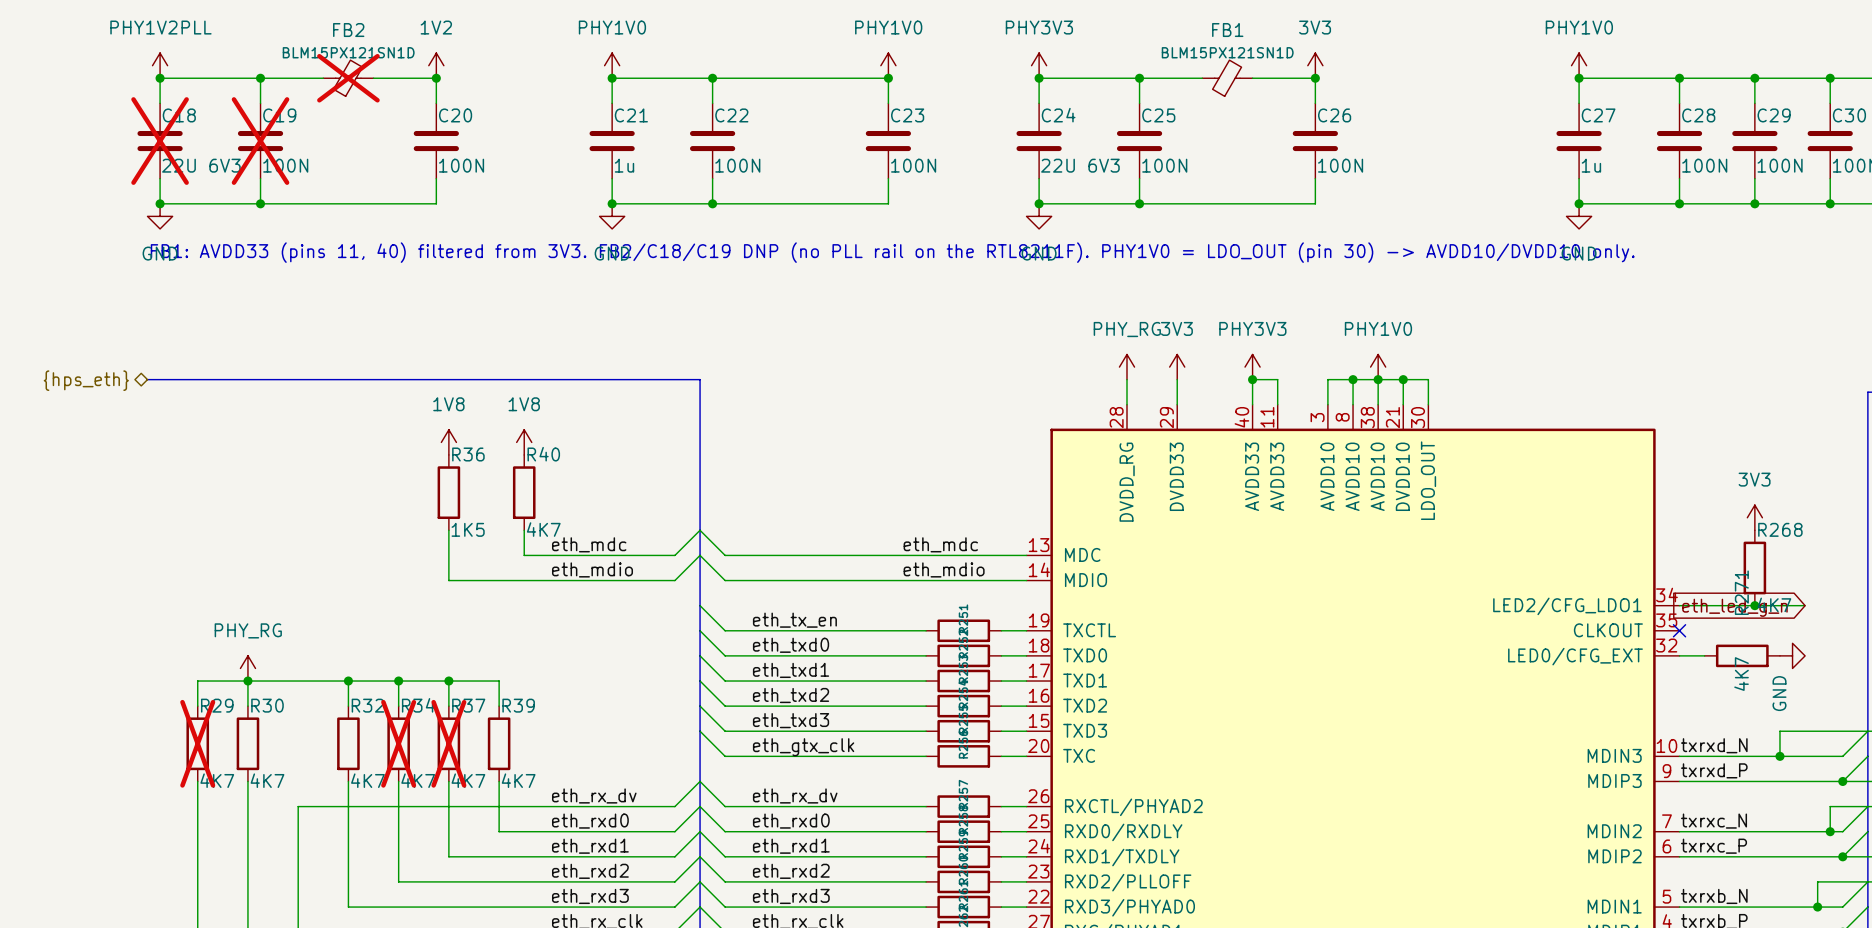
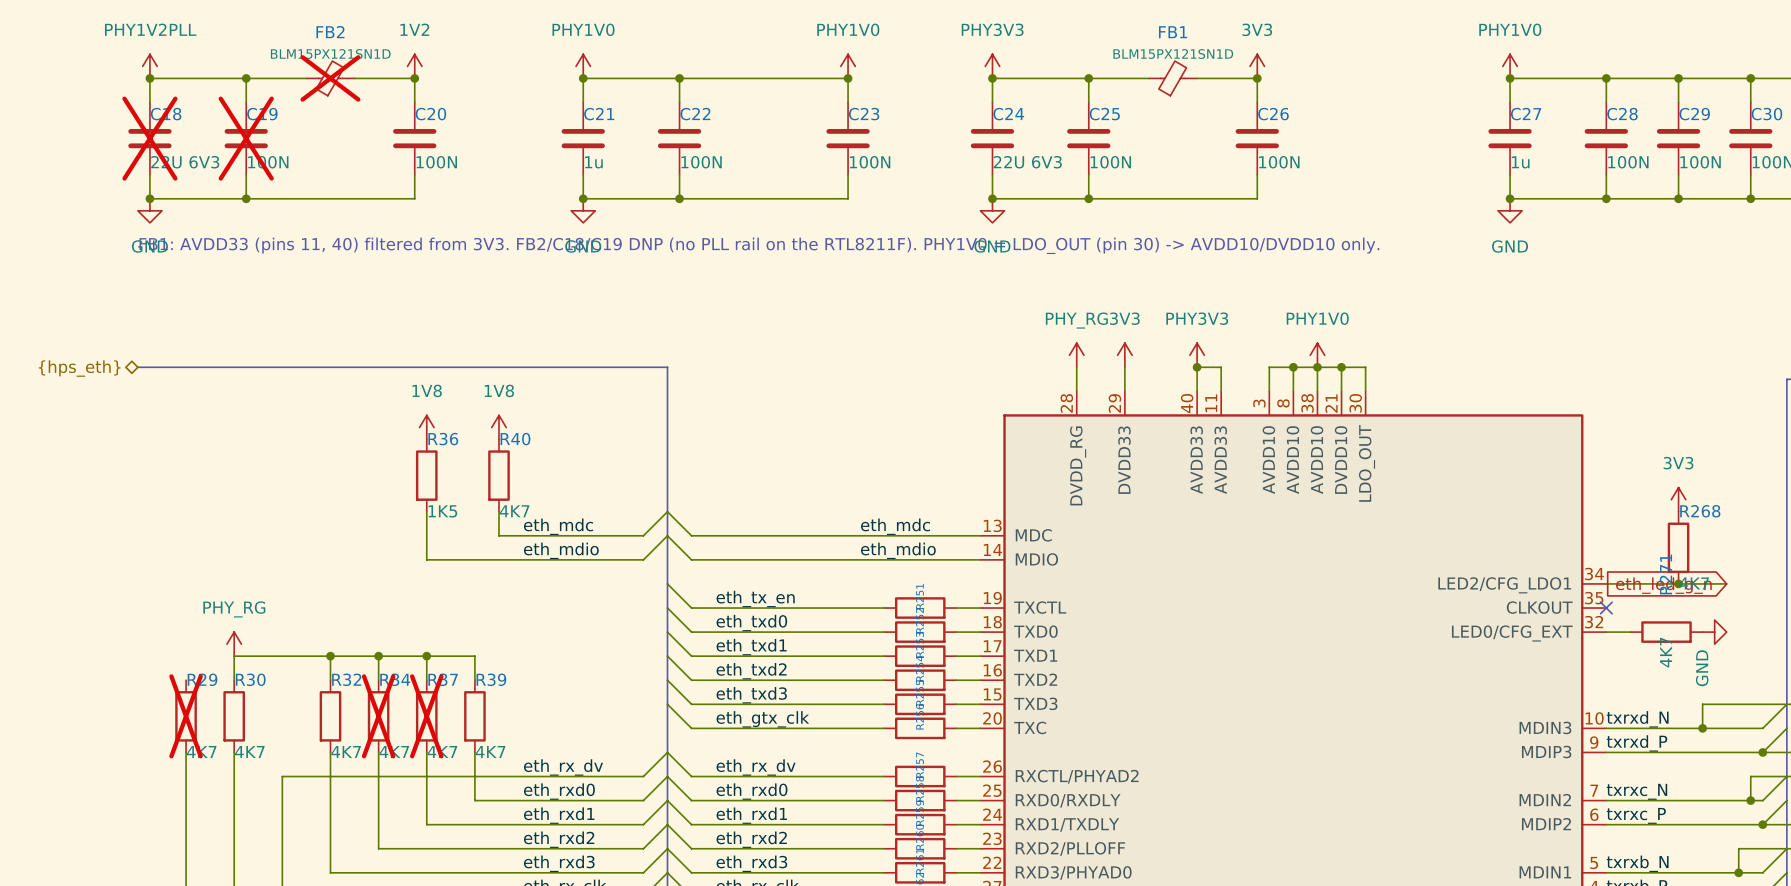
wire: (247, 681) (197, 681) (197, 706) -> none
junction: (247, 681) -> none

